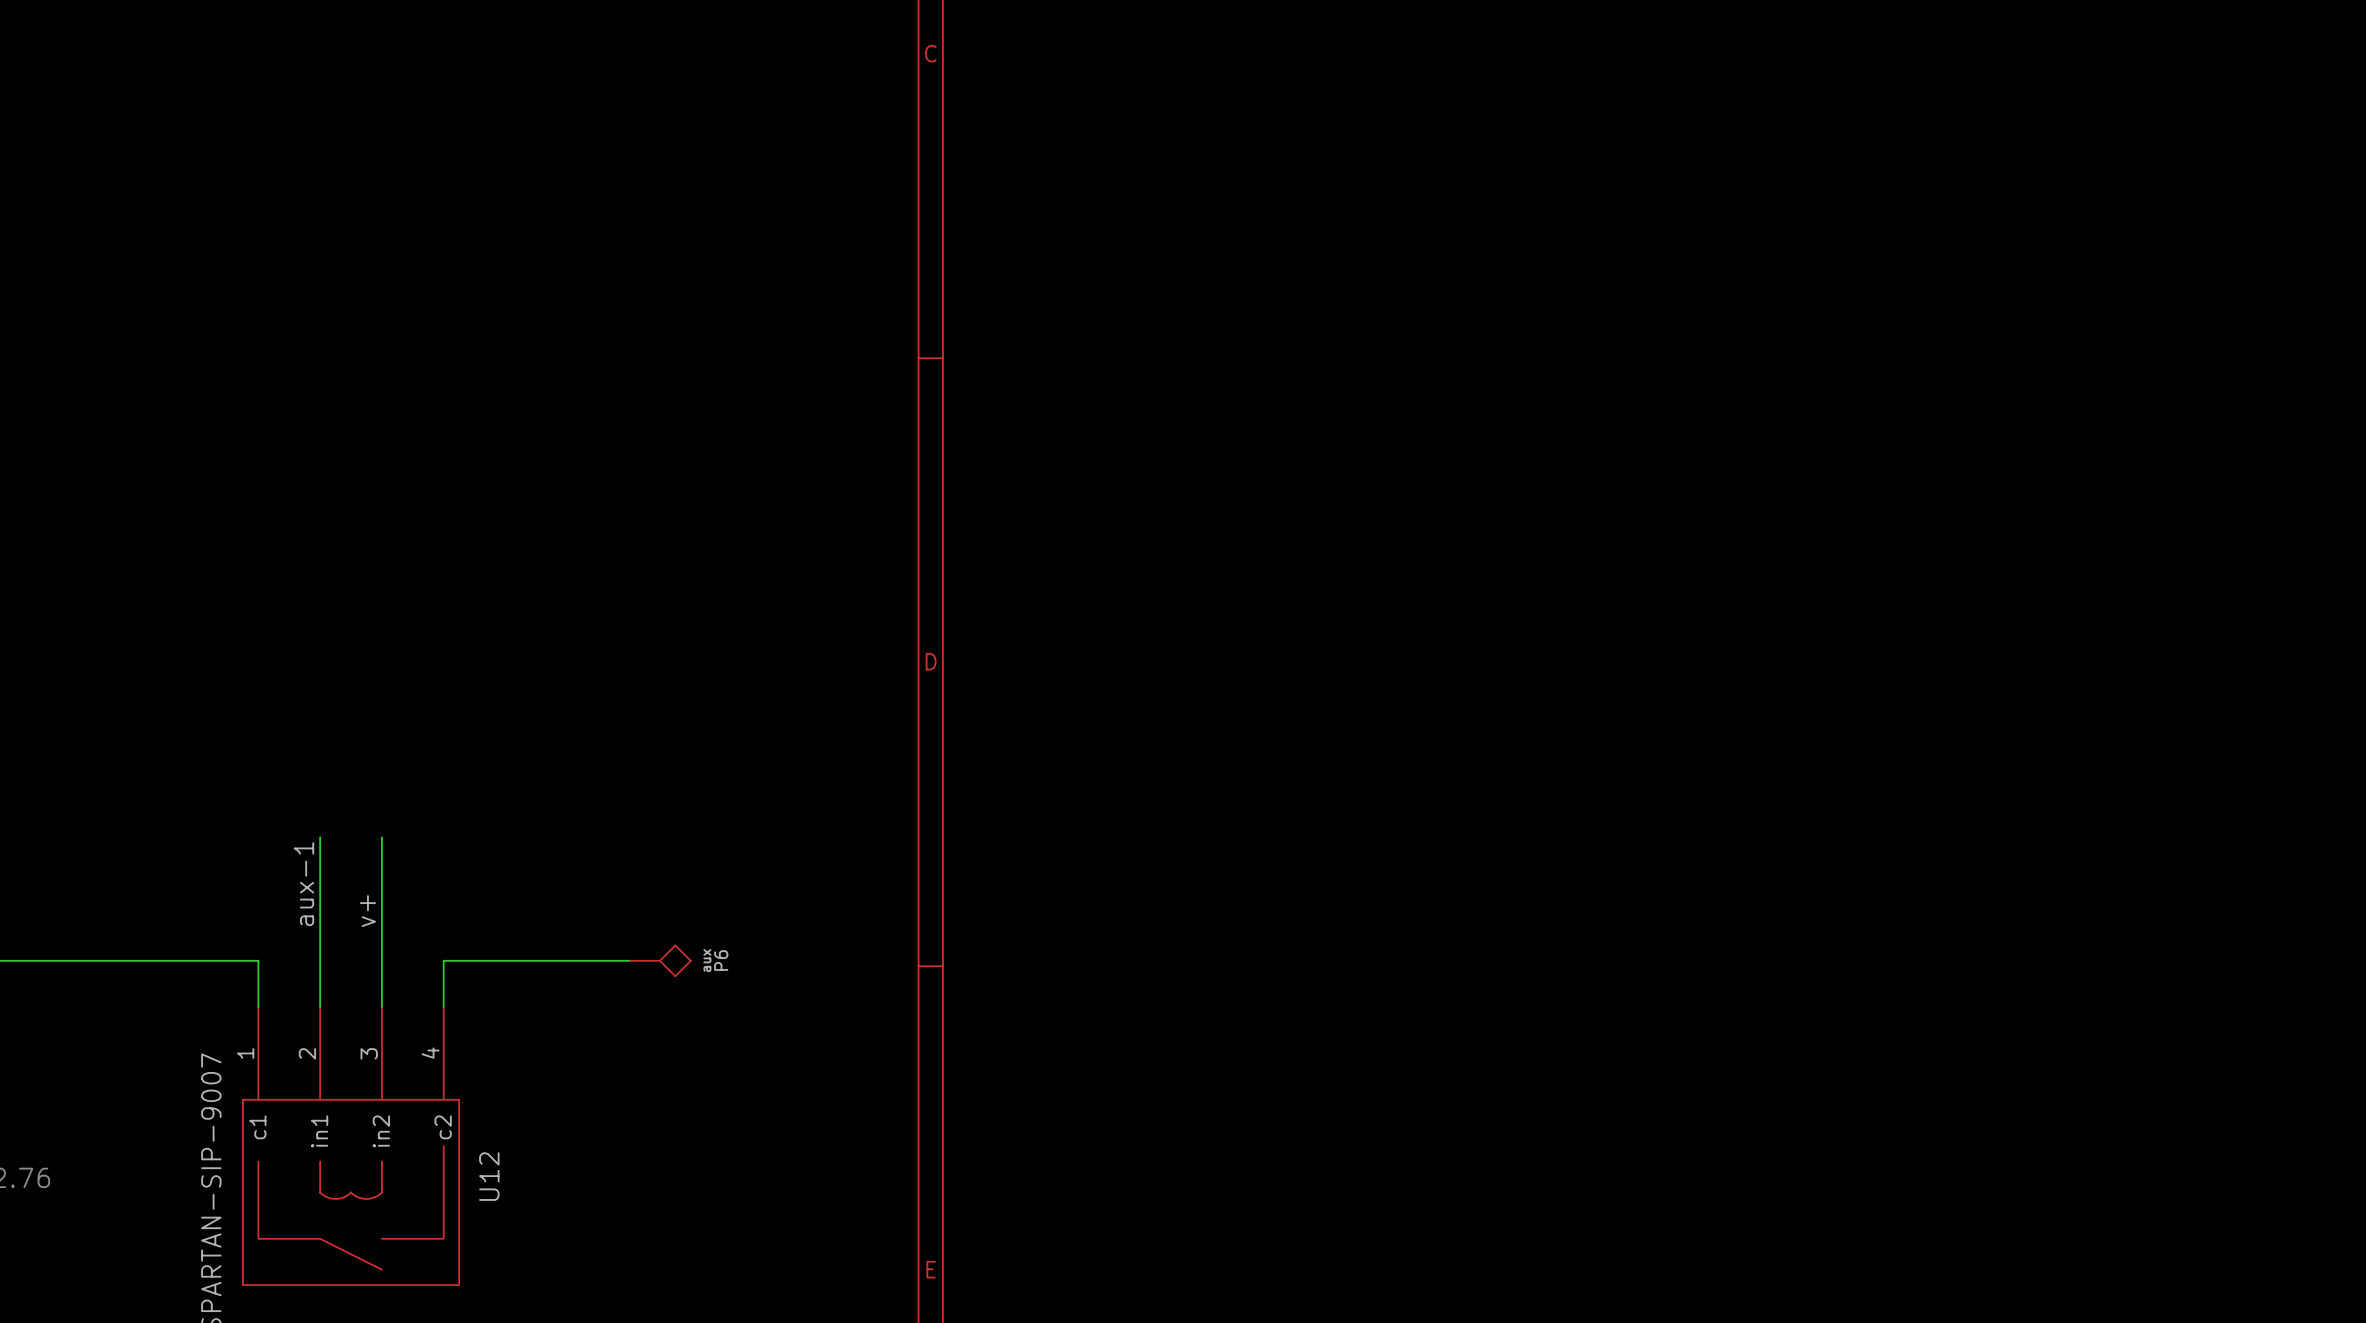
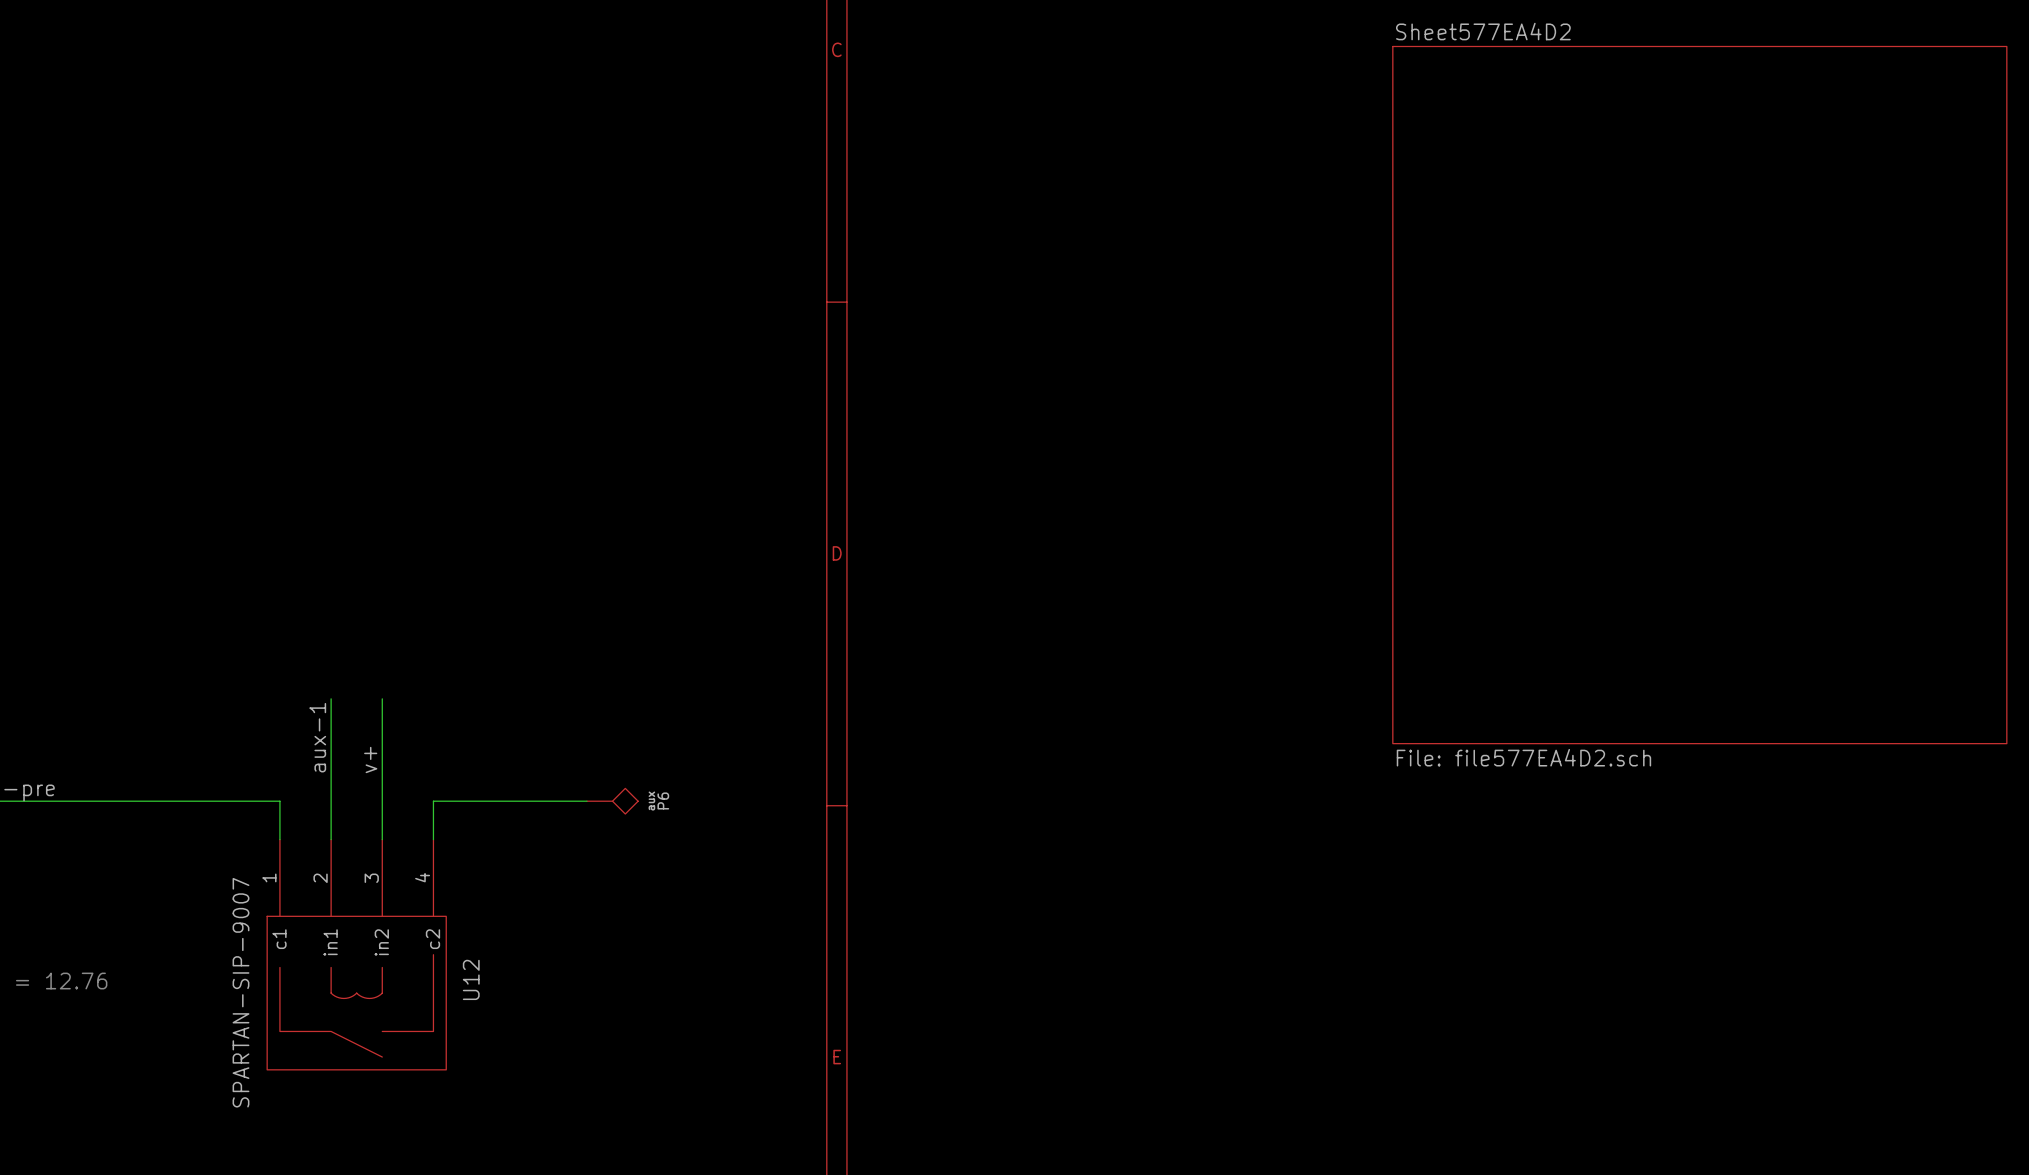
sheet Sheet577EA4D2: none -> File: file577EA4D2.sch (1699, 395)

